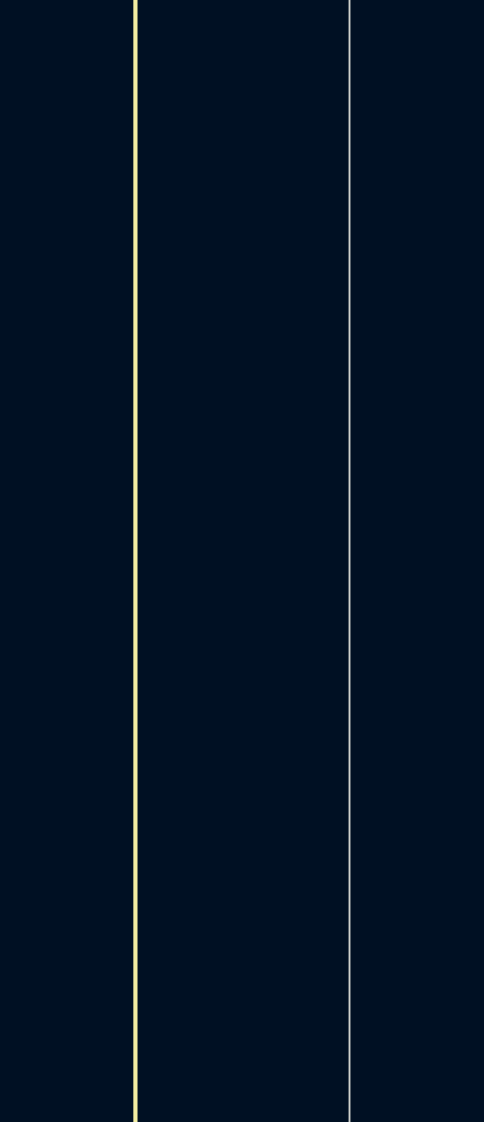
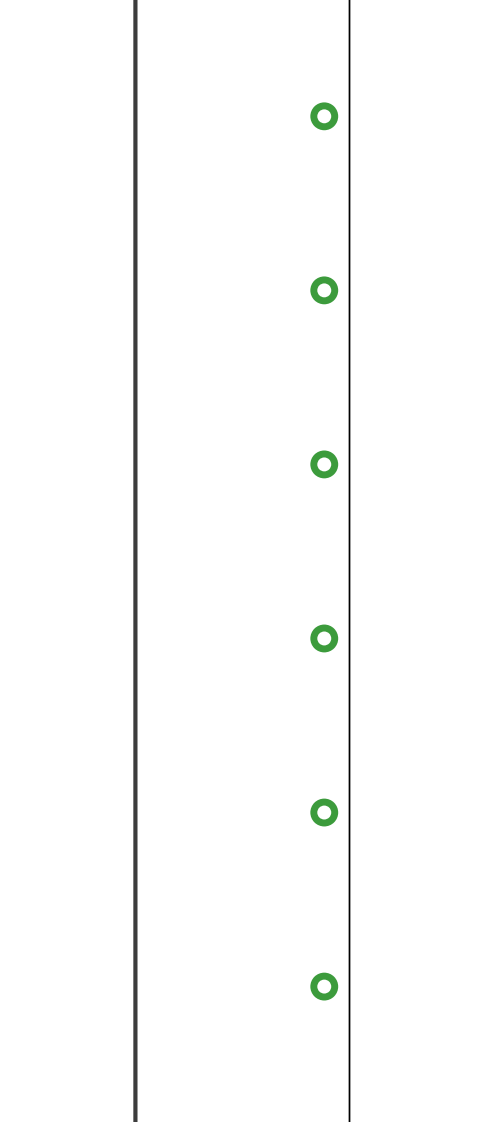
via: none -> (324, 116)
via: none -> (324, 290)
via: none -> (324, 464)
via: none -> (324, 638)
via: none -> (324, 812)
via: none -> (324, 986)

